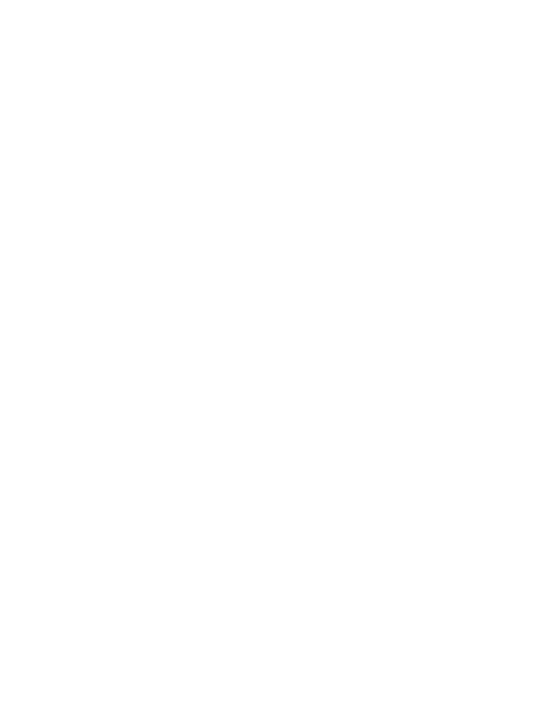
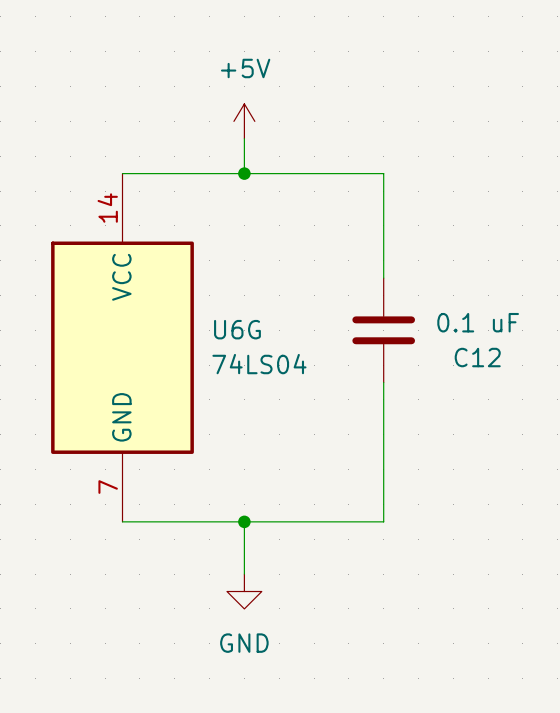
power symbol: none -> +5V (244, 121)
wire: none -> (244, 138) (244, 173)
wire: none -> (122, 173) (383, 173) (383, 278)
junction: none -> (244, 173)
C12: none -> 0.1 uF (383, 330)
U6G: none -> 74LS04 (122, 347)
wire: none -> (383, 382) (383, 521) (122, 521)
wire: none -> (244, 521) (244, 574)
junction: none -> (244, 521)
power symbol: none -> GND (244, 591)

